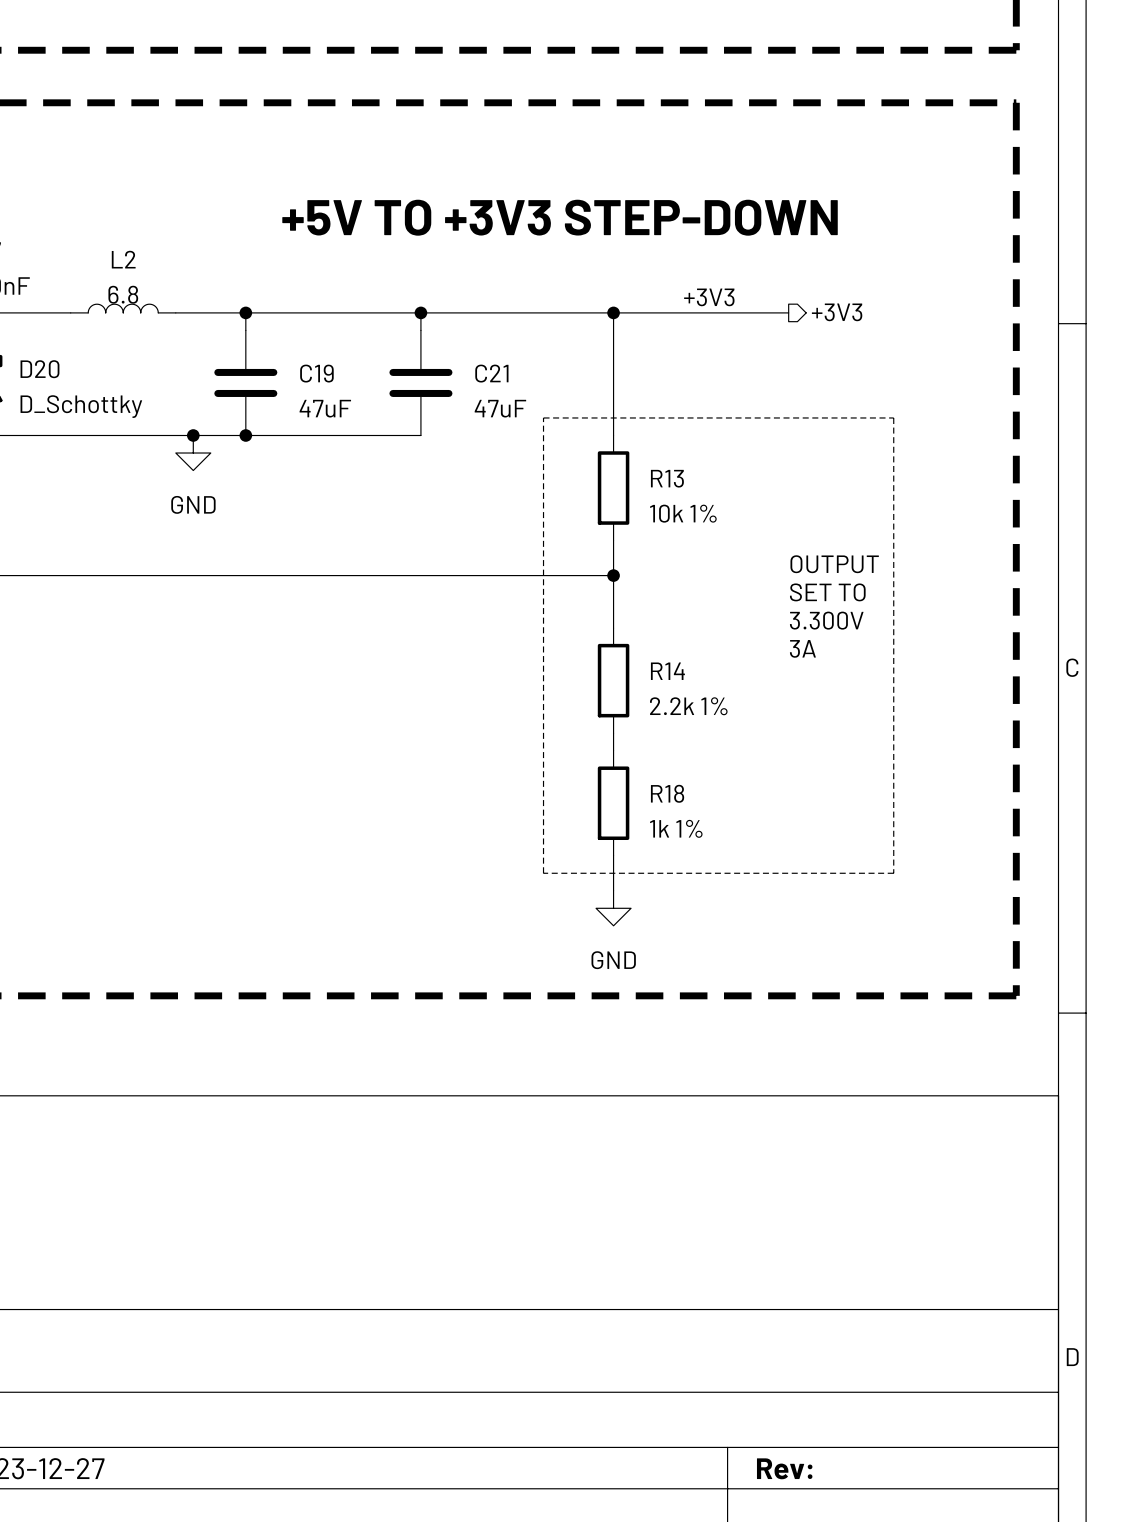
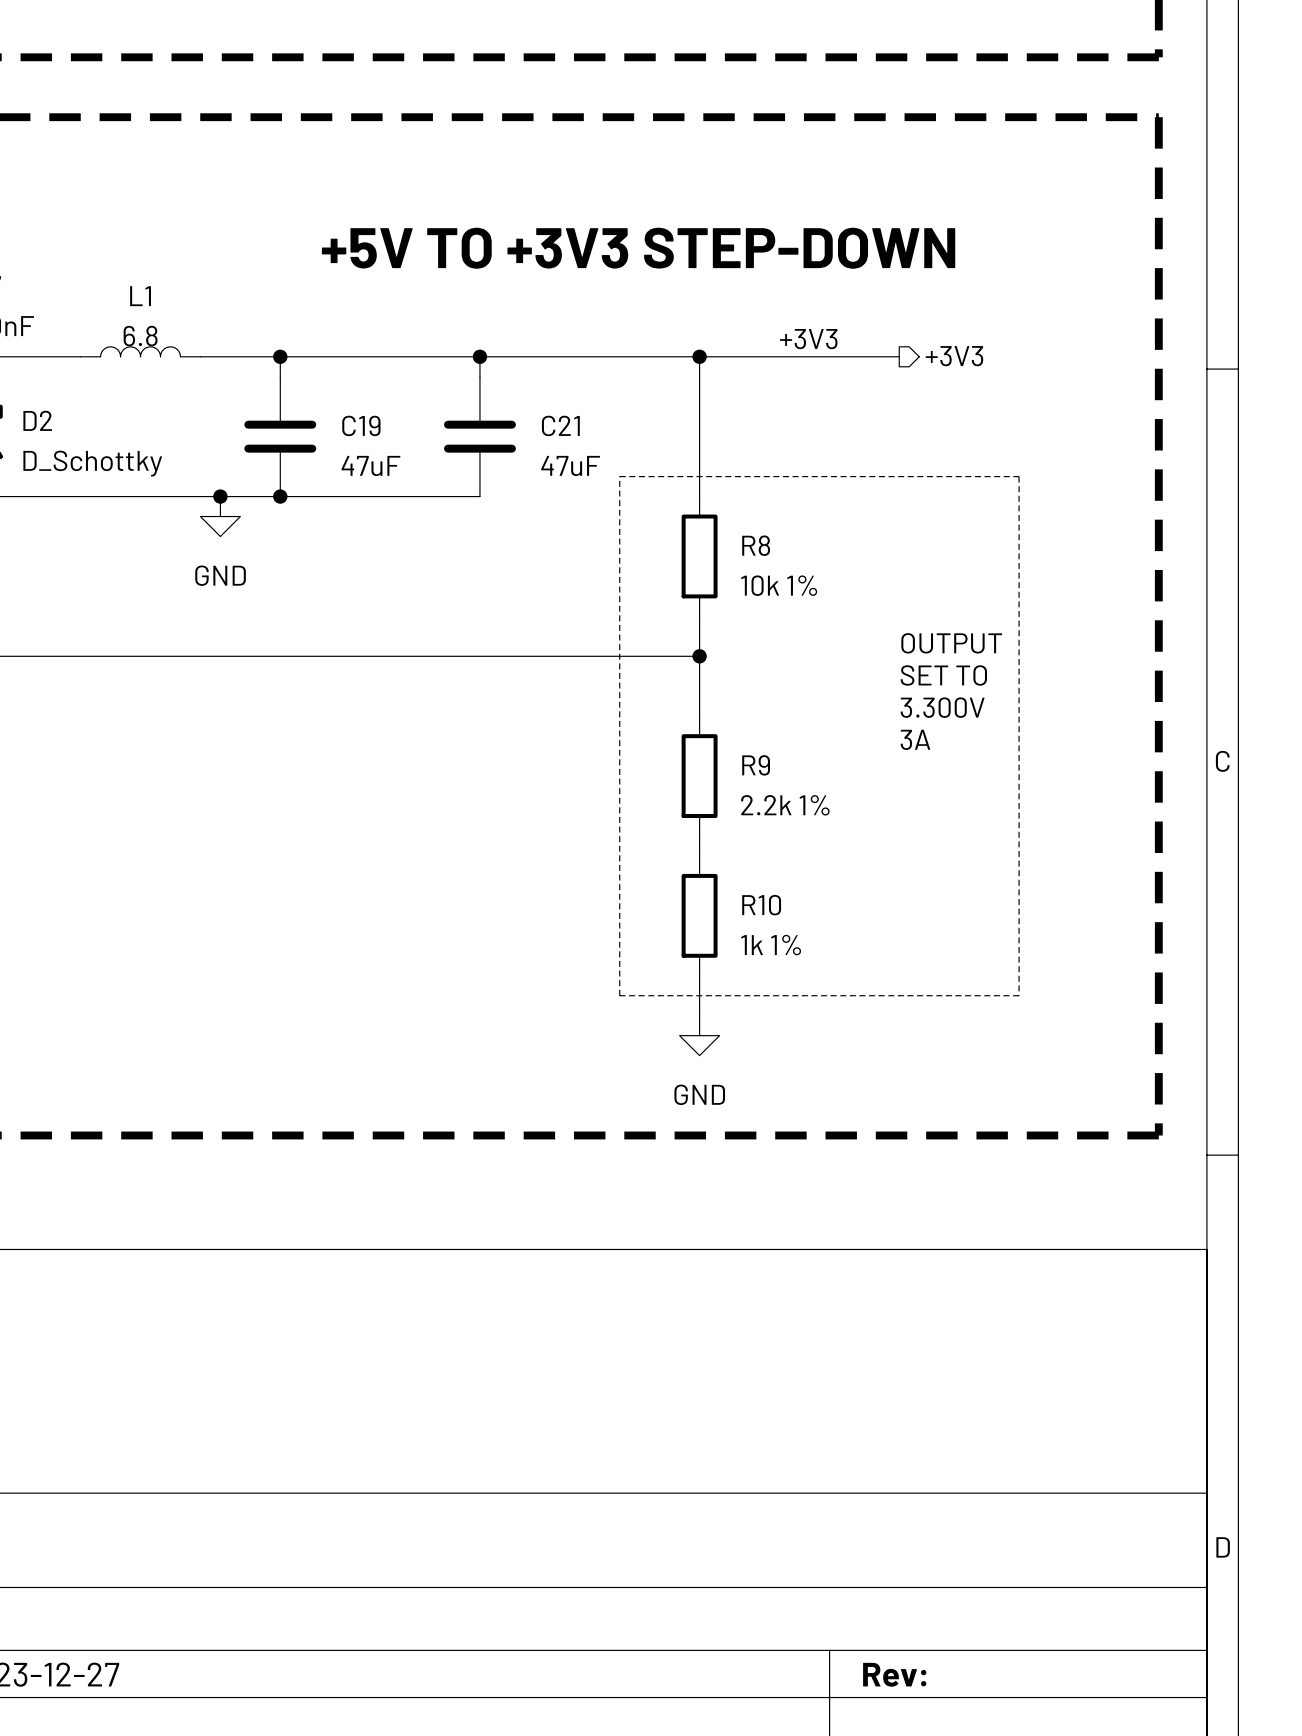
L2 name: L2 (123, 259) -> L1 (140, 296)
D20 name: D20 (39, 369) -> D2 (37, 420)
R13 name: R13 (667, 478) -> R8 (756, 545)
R14 name: R14 (667, 671) -> R9 (756, 765)
R18 name: R18 (667, 793) -> R10 (761, 905)

